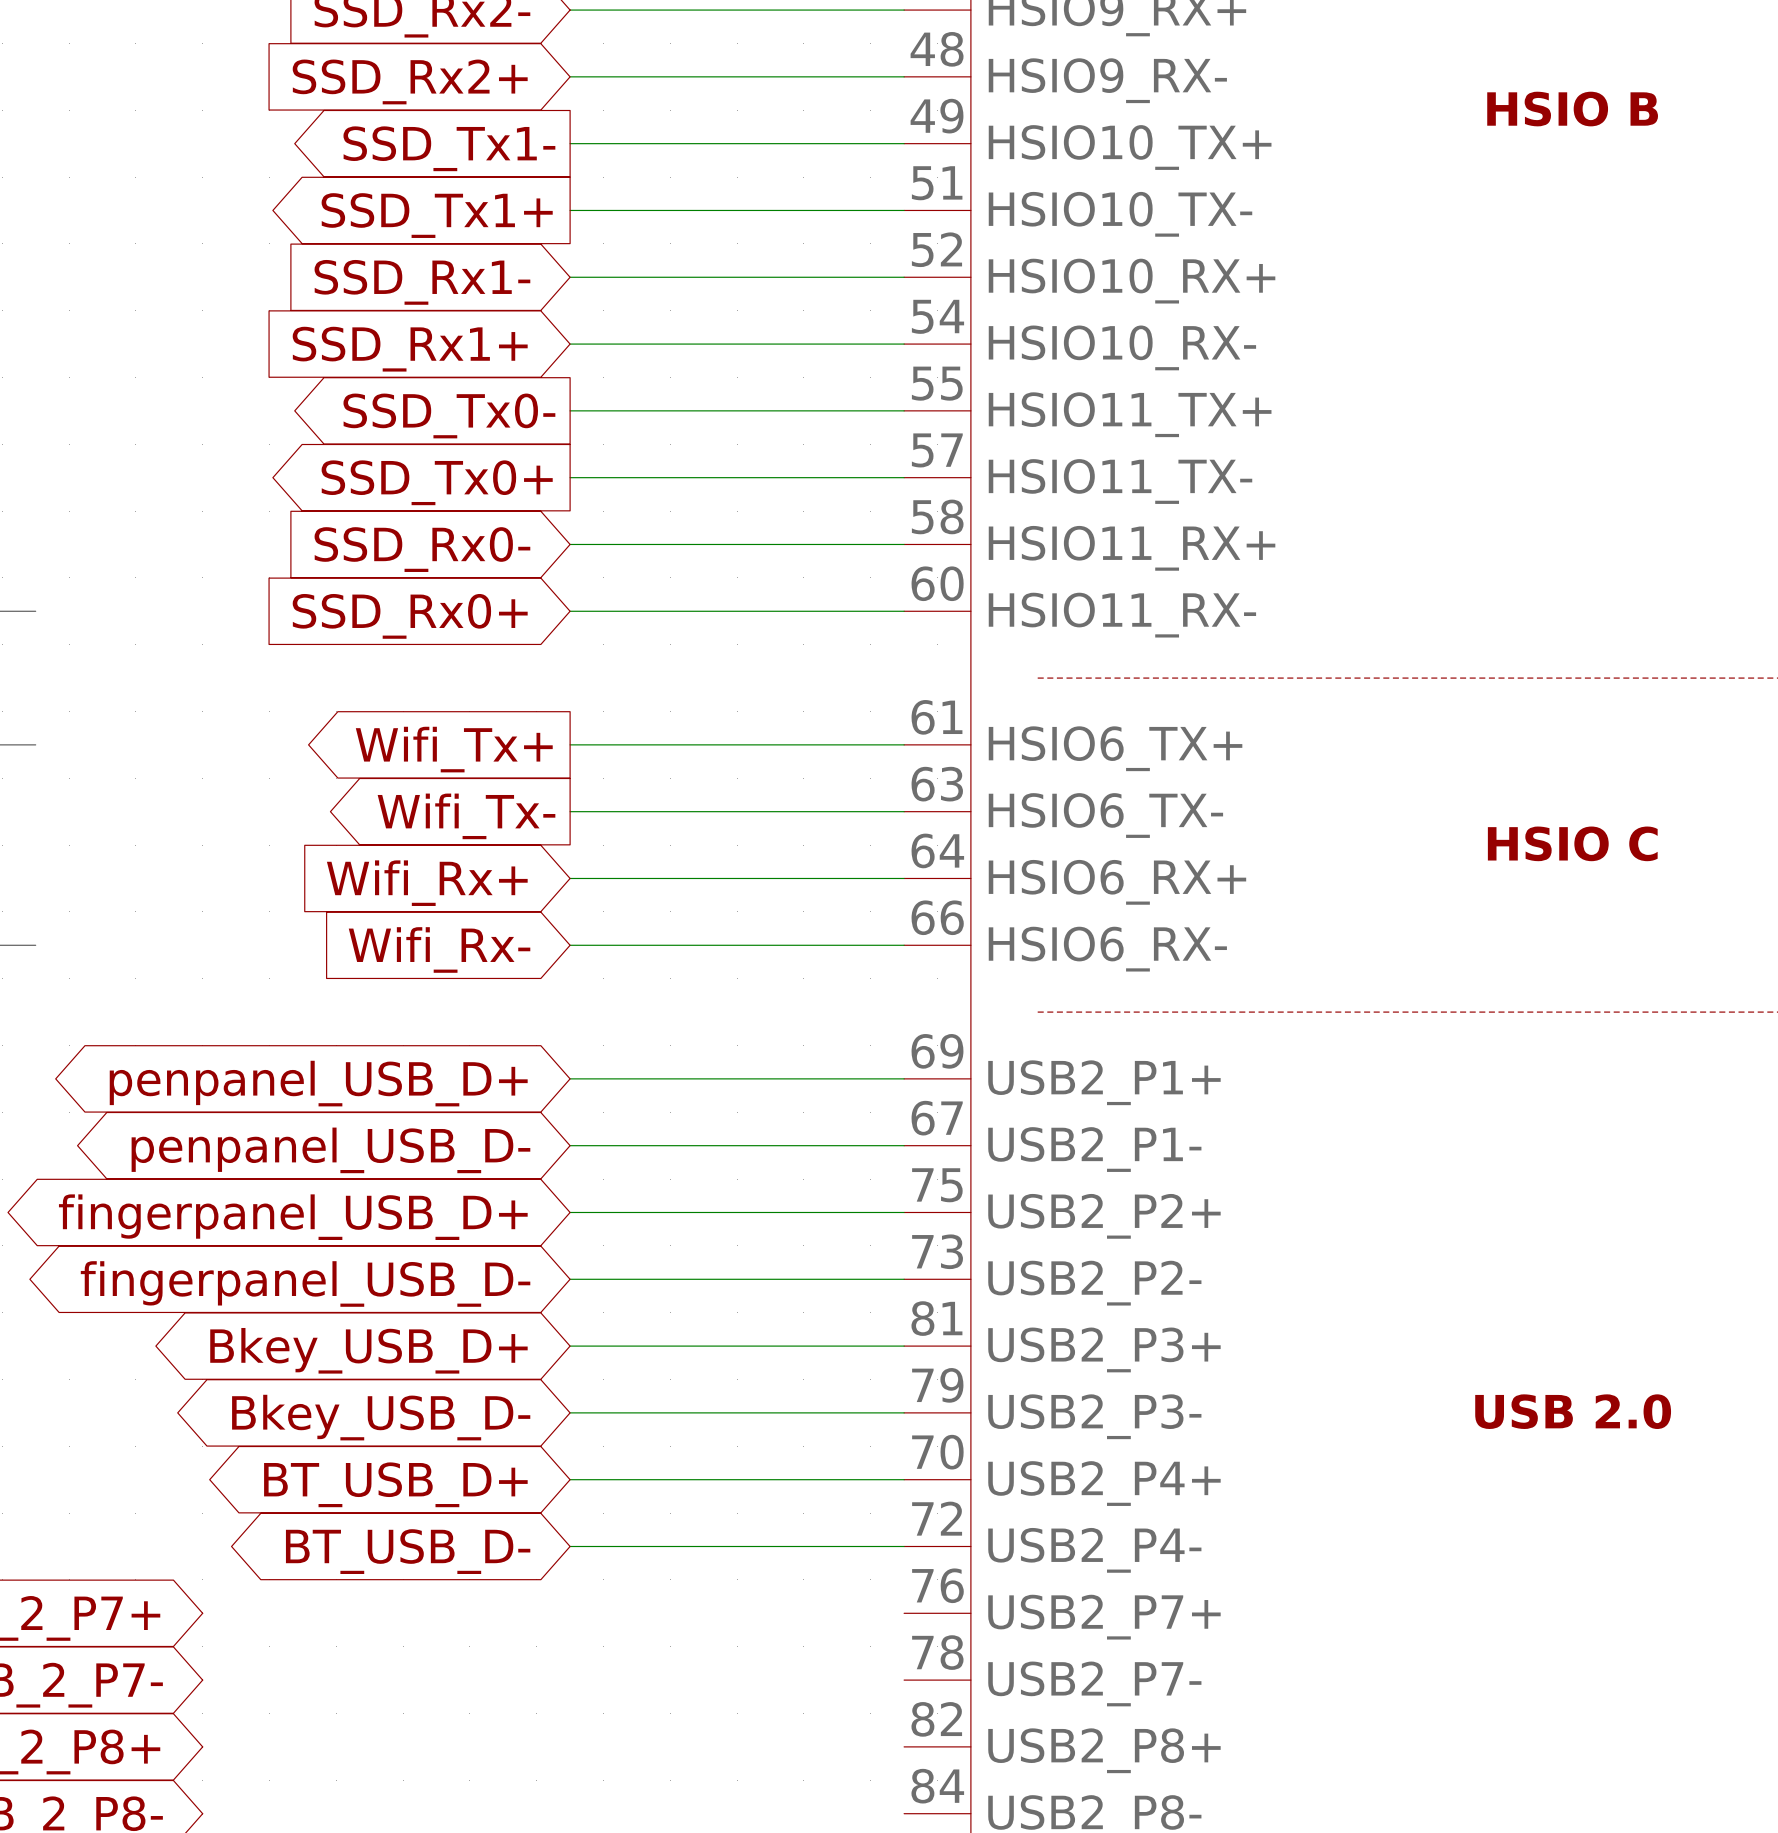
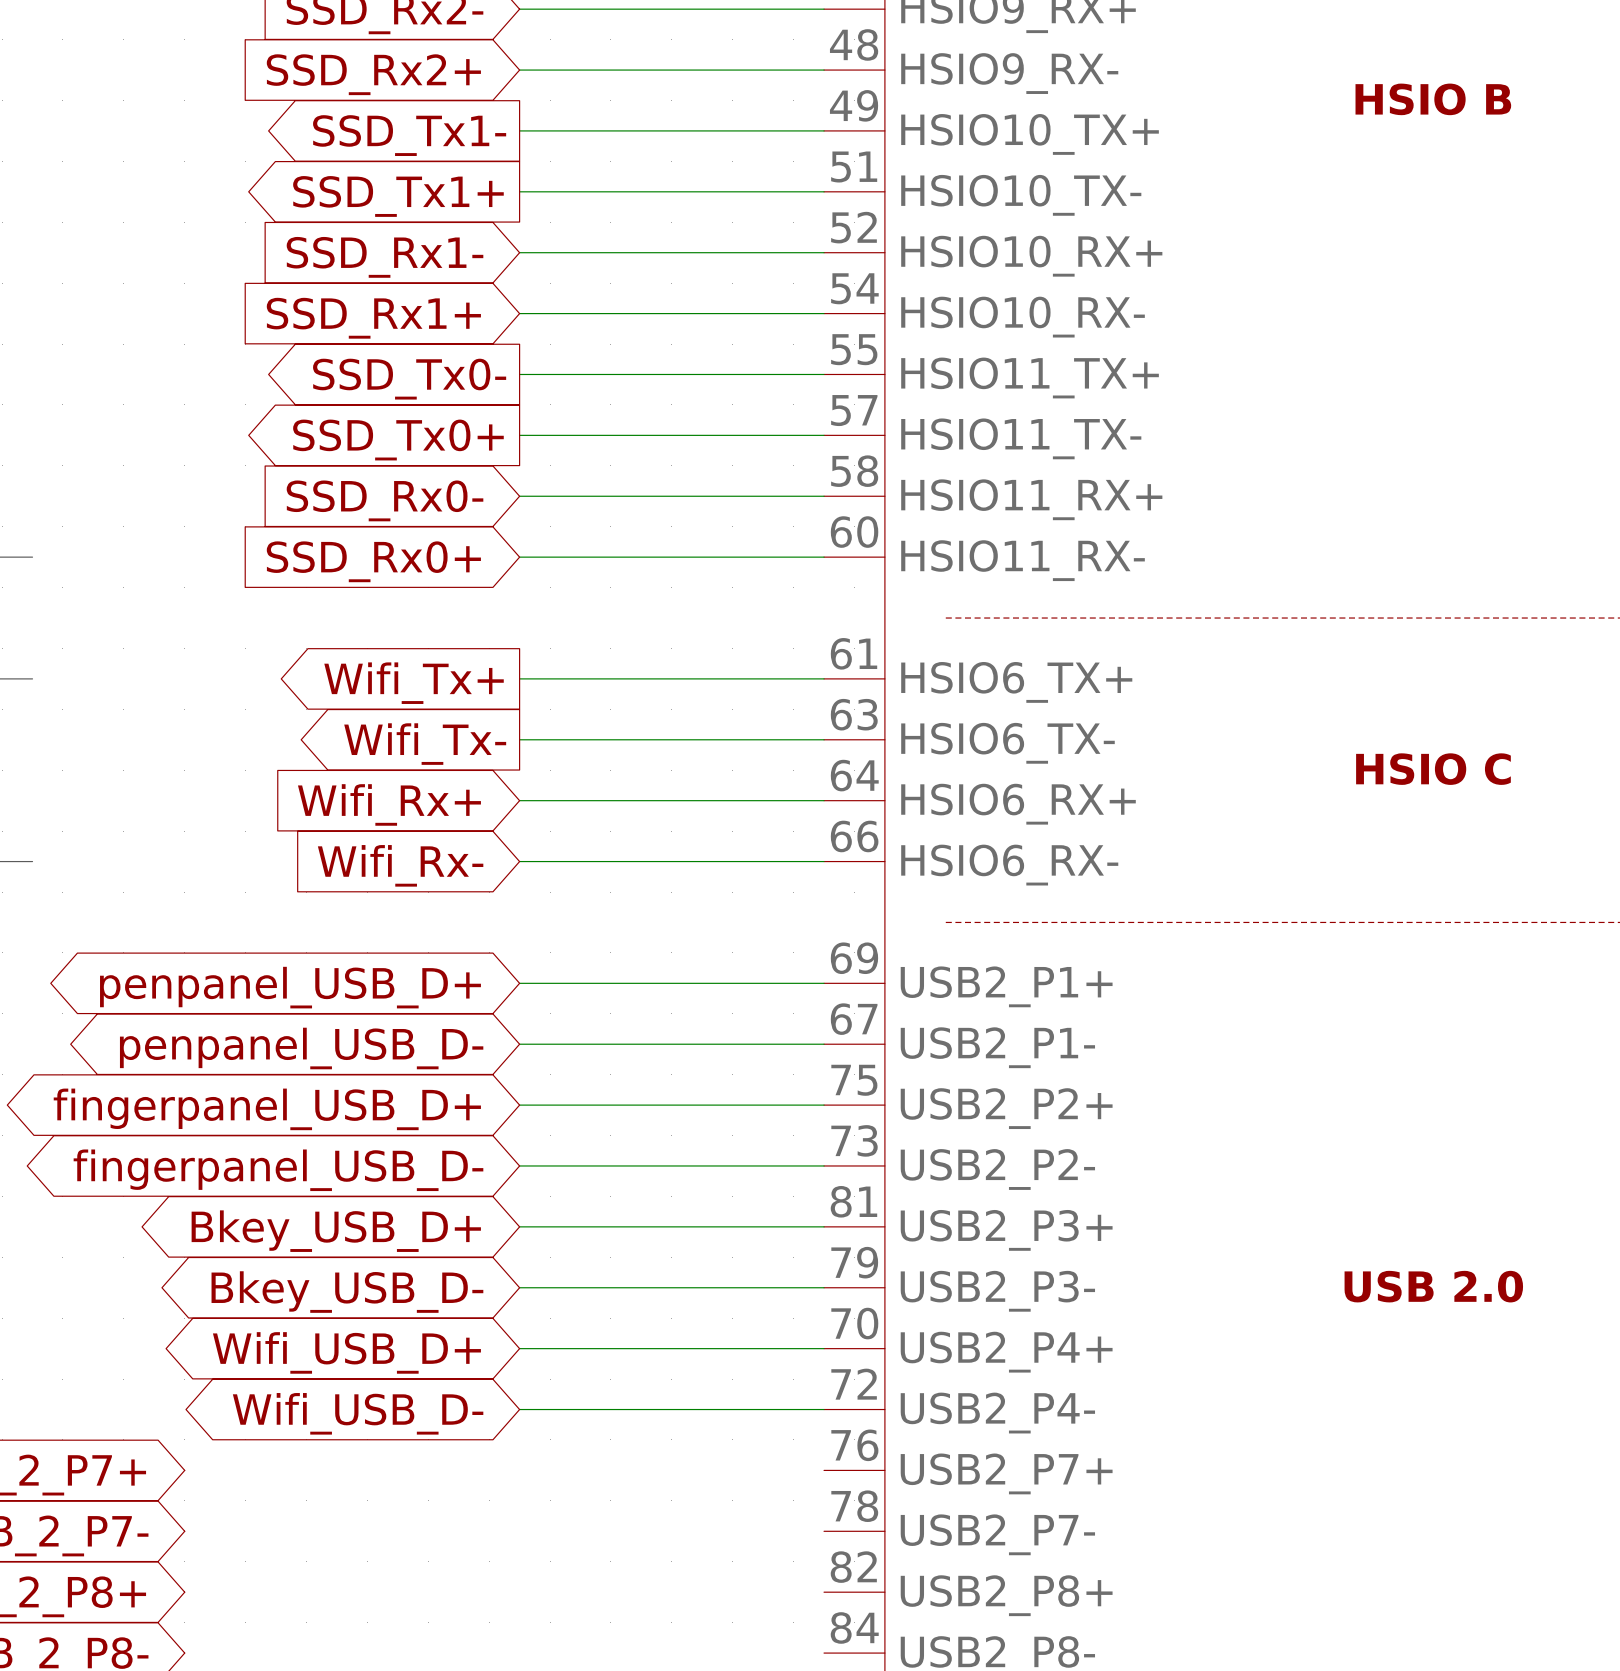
global label: BT_USB_D+ (395, 1484) -> Wifi_USB_D+ (346, 1352)
global label: BT_USB_D- (408, 1551) -> Wifi_USB_D- (358, 1413)

